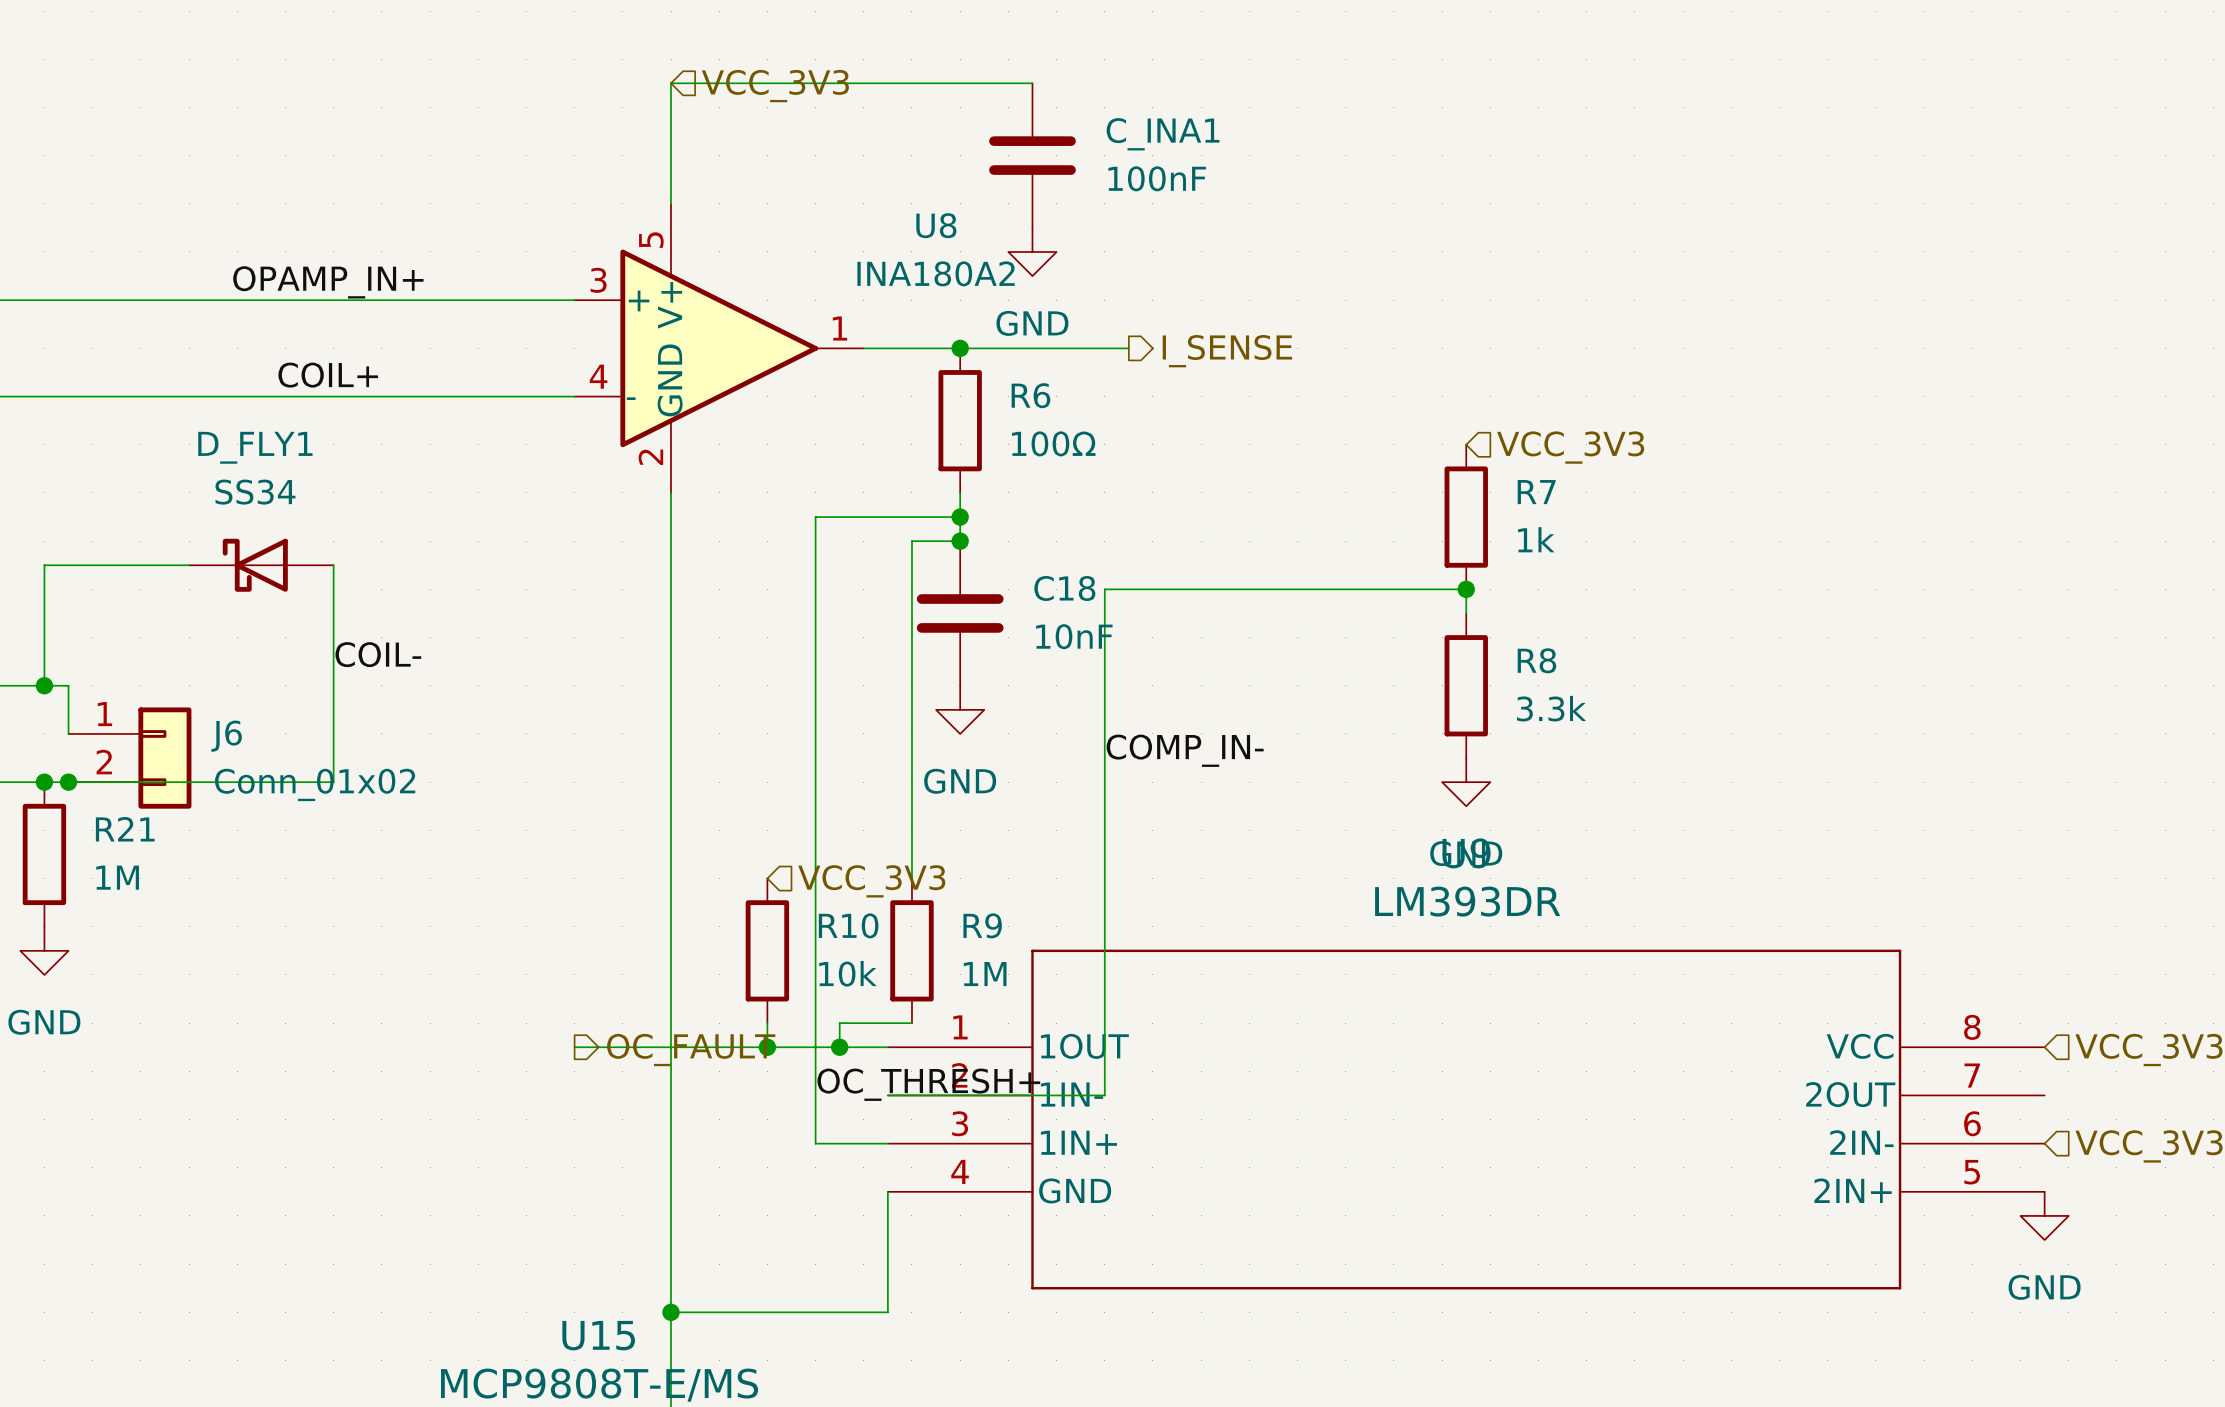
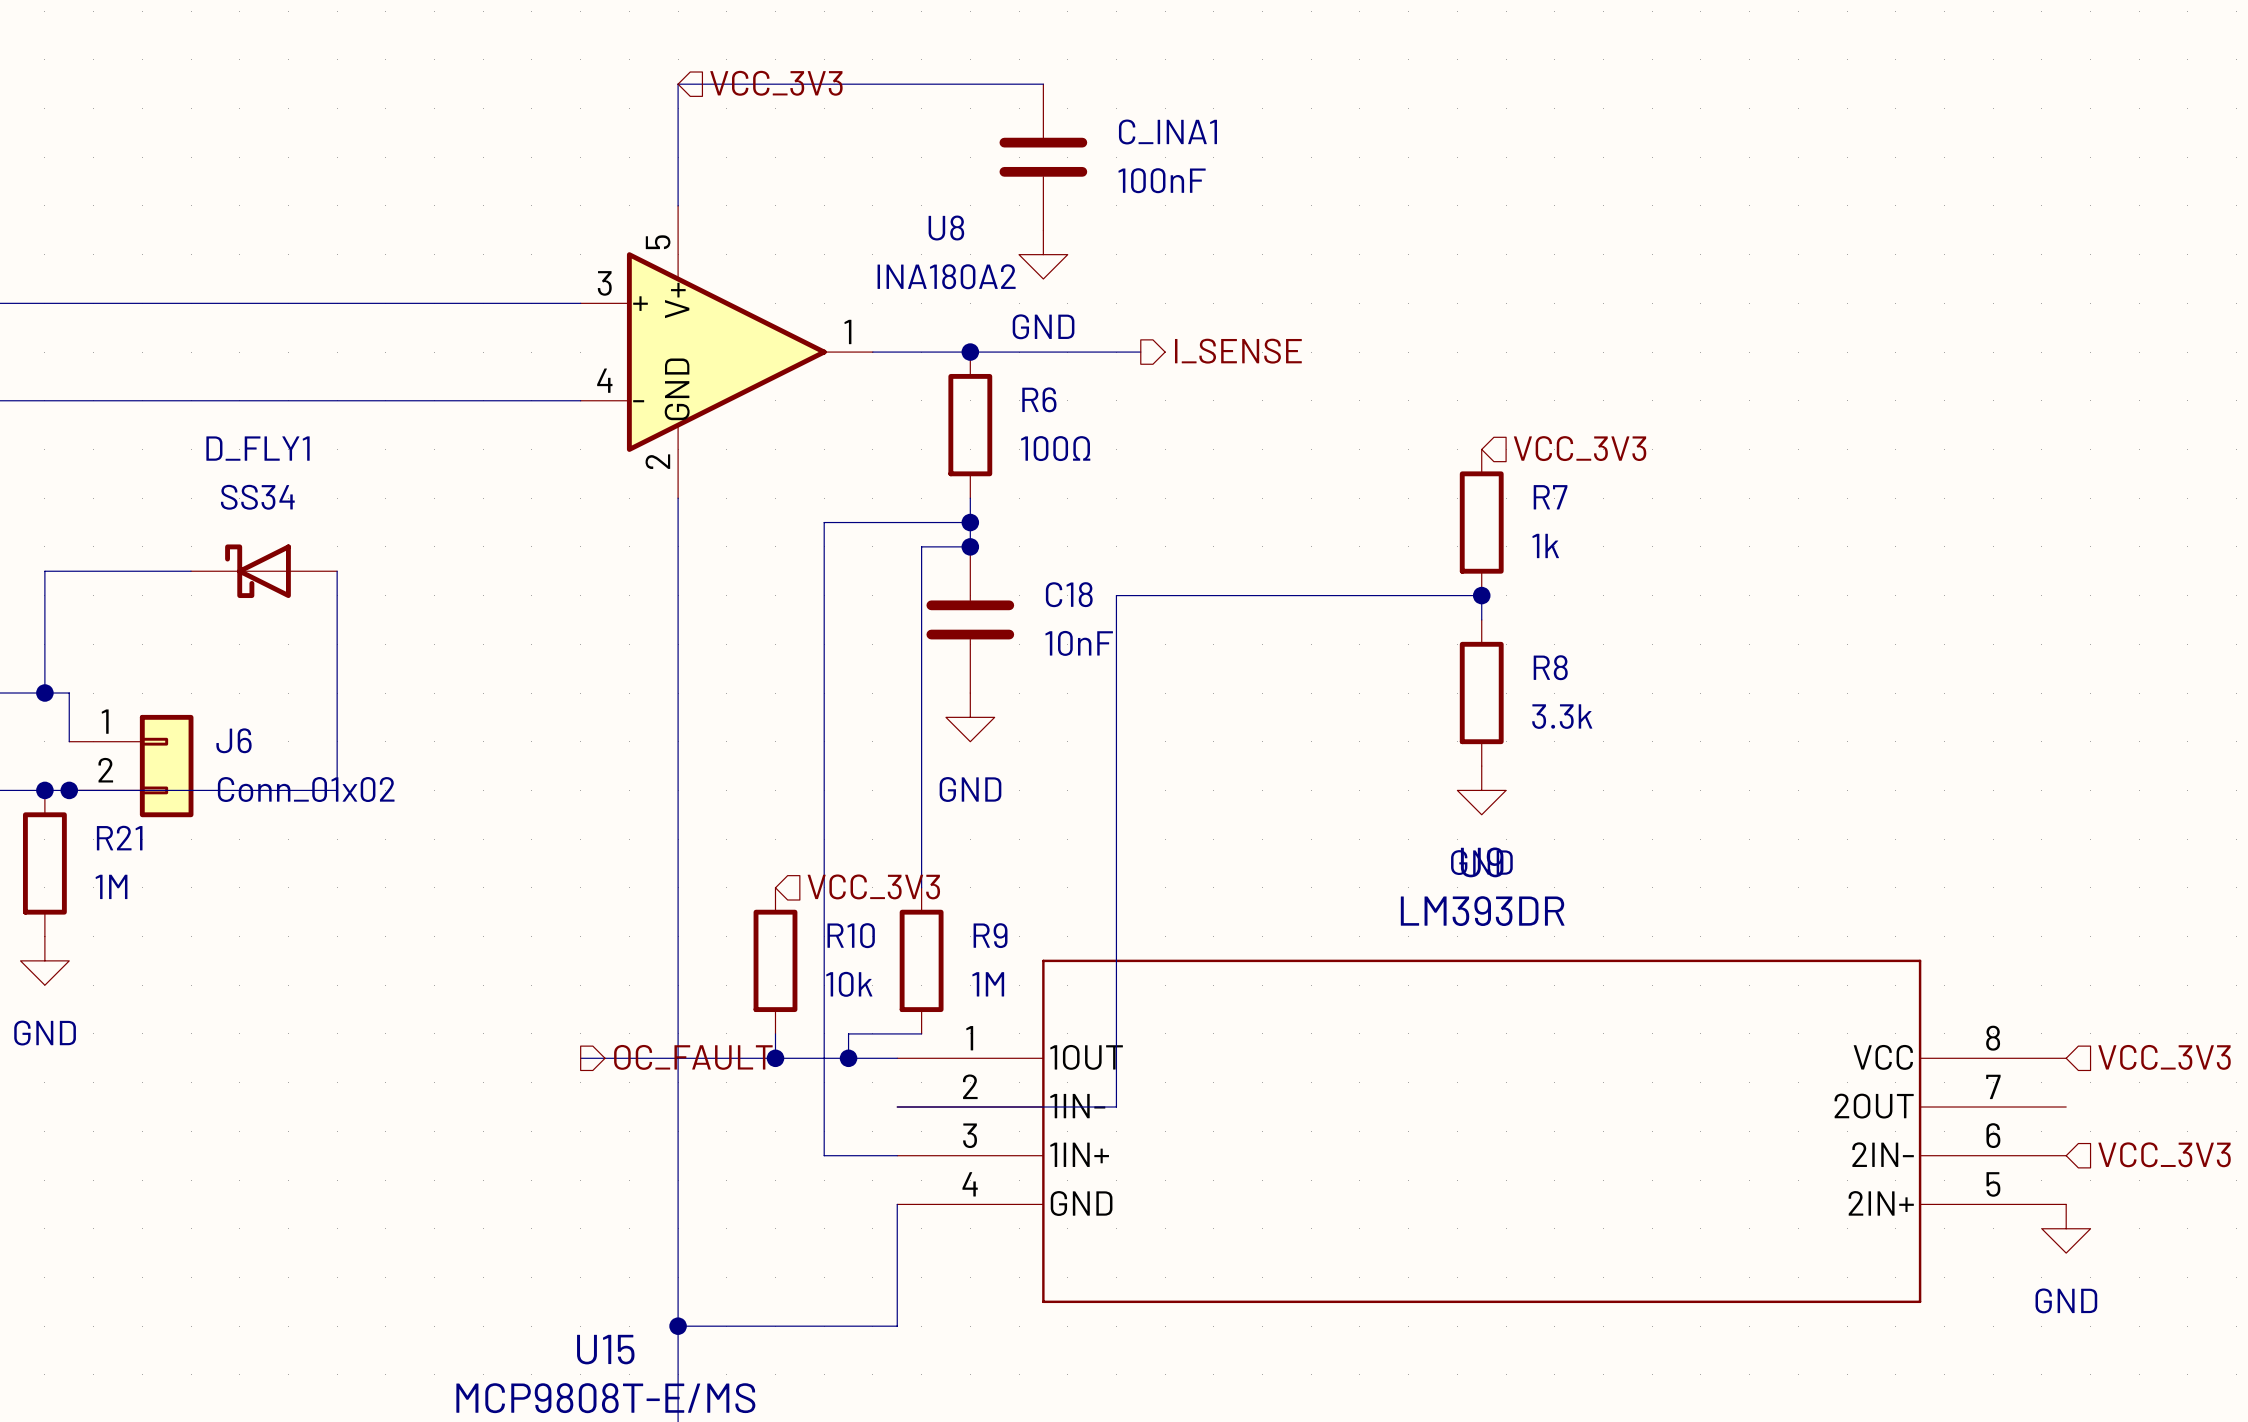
label: OPAMP_IN+ (328, 282) -> none
label: COIL+ (328, 375) -> none
label: COIL- (378, 654) -> none
label: COMP_IN- (1185, 750) -> none
label: OC_THRESH+ (928, 1084) -> none

